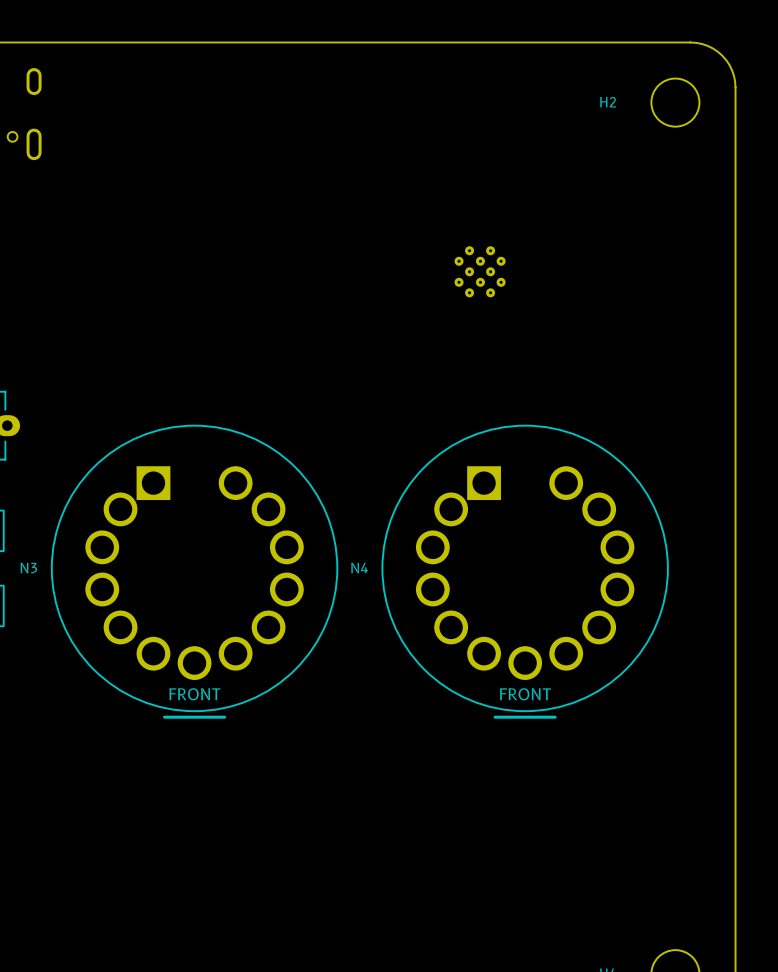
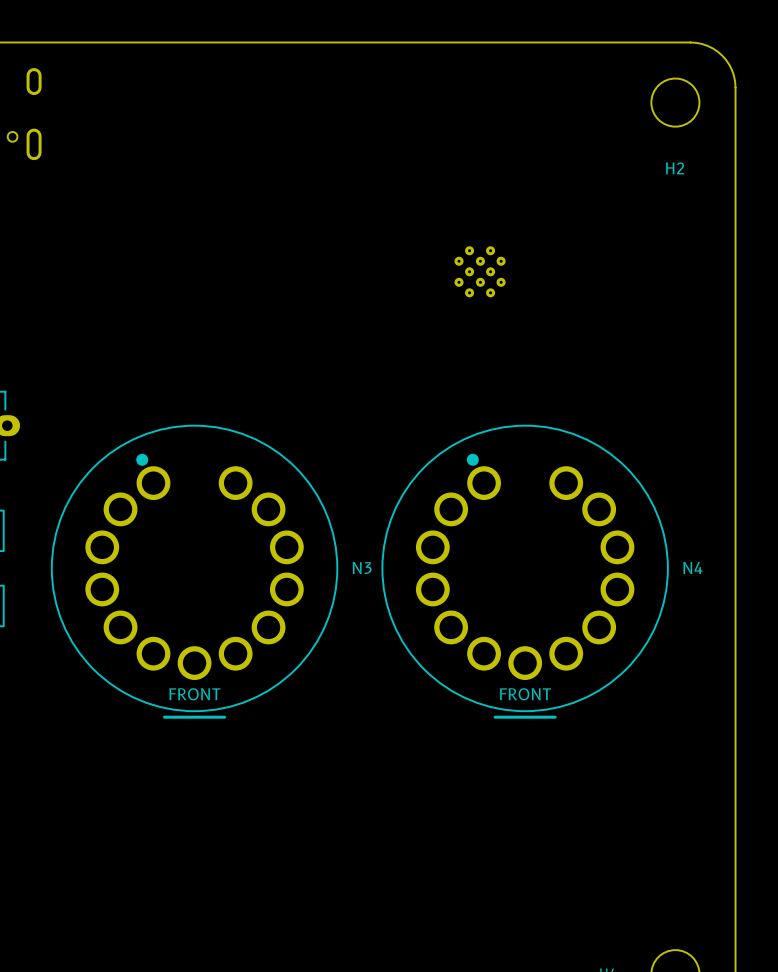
H2 name position: H2 (608, 102) -> H2 (675, 168)
N3 footprint: [50, 424, 339, 719] -> [50, 424, 339, 719]
N4 footprint: [381, 424, 669, 719] -> [381, 424, 669, 719]
N3 name position: N3 (28, 568) -> N3 (362, 567)
N4 name position: N4 (359, 568) -> N4 (692, 567)

